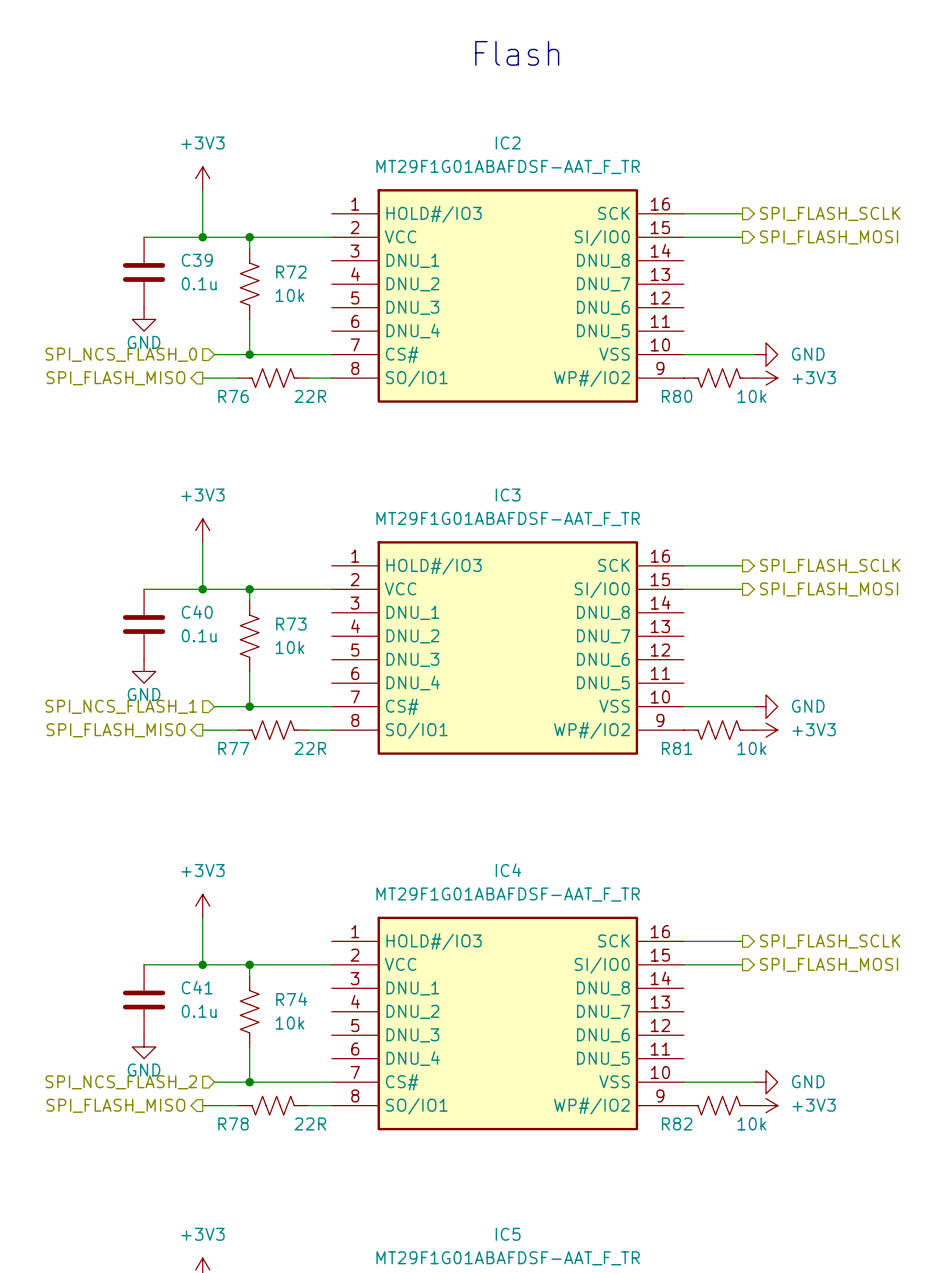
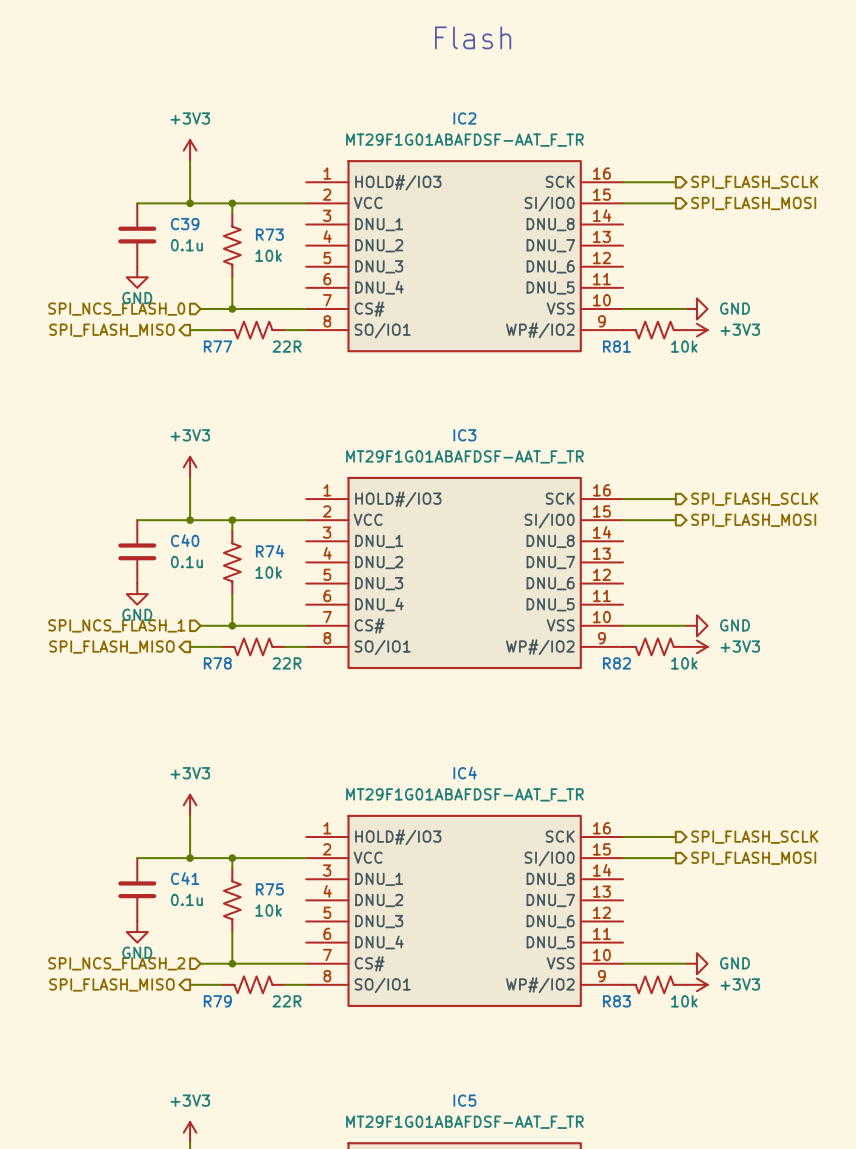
R72 name: R72 (291, 272) -> R73 (269, 234)
R76 name: R76 (233, 396) -> R77 (218, 346)
R80 name: R80 (677, 396) -> R81 (616, 346)
R73 name: R73 (291, 624) -> R74 (270, 551)
R77 name: R77 (233, 748) -> R78 (217, 663)
R81 name: R81 (677, 748) -> R82 (616, 663)
R74 name: R74 (291, 999) -> R75 (269, 889)
R78 name: R78 (233, 1123) -> R79 (217, 1001)
R82 name: R82 (677, 1123) -> R83 (616, 1001)

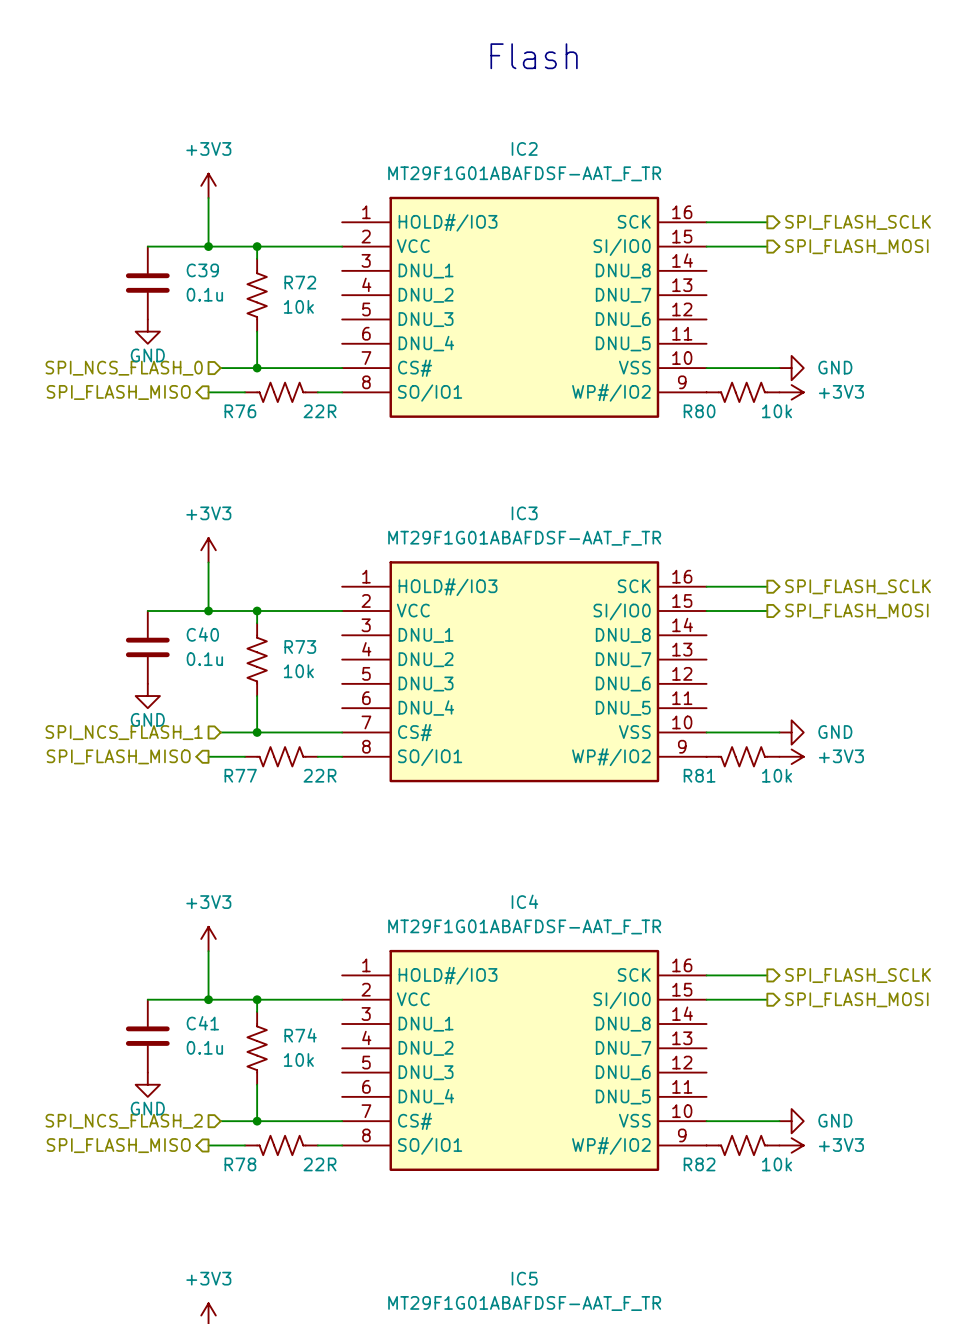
R73 name: R73 (269, 234) -> R72 (300, 282)
R77 name: R77 (218, 346) -> R76 (240, 411)
R81 name: R81 (616, 346) -> R80 (699, 411)
R74 name: R74 (270, 551) -> R73 (300, 646)
R78 name: R78 (217, 663) -> R77 (240, 775)
R82 name: R82 (616, 663) -> R81 (699, 775)
R75 name: R75 (269, 889) -> R74 (300, 1035)
R79 name: R79 (217, 1001) -> R78 (240, 1164)
R83 name: R83 (616, 1001) -> R82 (699, 1164)

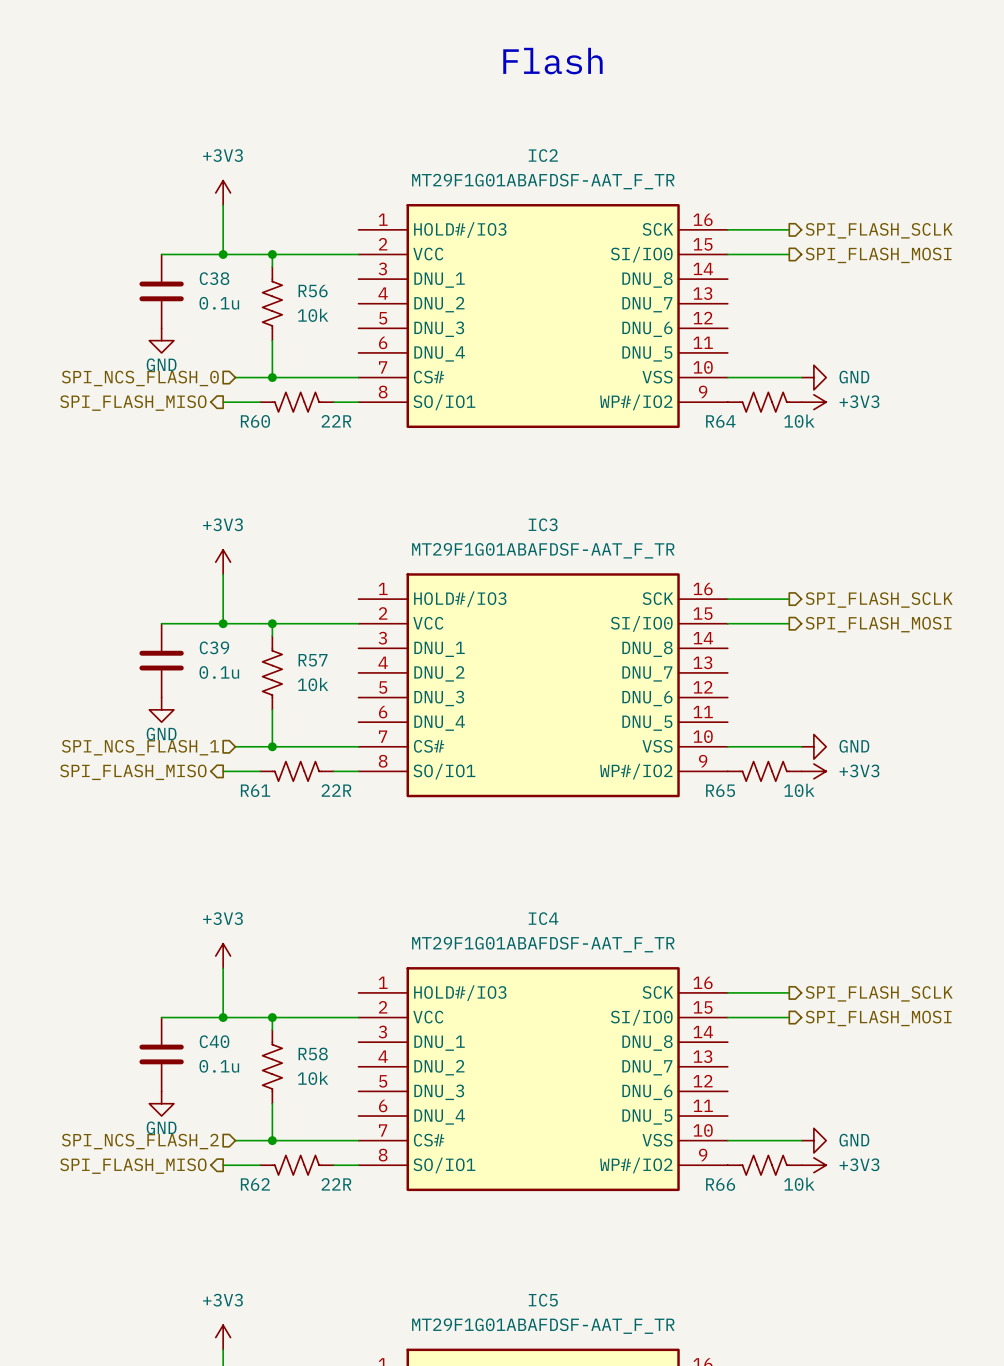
C39 name: C39 (202, 270) -> C38 (214, 278)
R72 name: R72 (300, 282) -> R56 (313, 291)
R76 name: R76 (240, 411) -> R60 (255, 421)
R80 name: R80 (699, 411) -> R64 (720, 421)
C40 name: C40 (202, 634) -> C39 (214, 647)
R73 name: R73 (300, 646) -> R57 (313, 660)
R77 name: R77 (240, 775) -> R61 (255, 790)
R81 name: R81 (699, 775) -> R65 (720, 790)
C41 name: C41 (202, 1023) -> C40 (214, 1041)
R74 name: R74 (300, 1035) -> R58 (313, 1054)
R78 name: R78 (240, 1164) -> R62 (255, 1184)
R82 name: R82 (699, 1164) -> R66 (720, 1184)

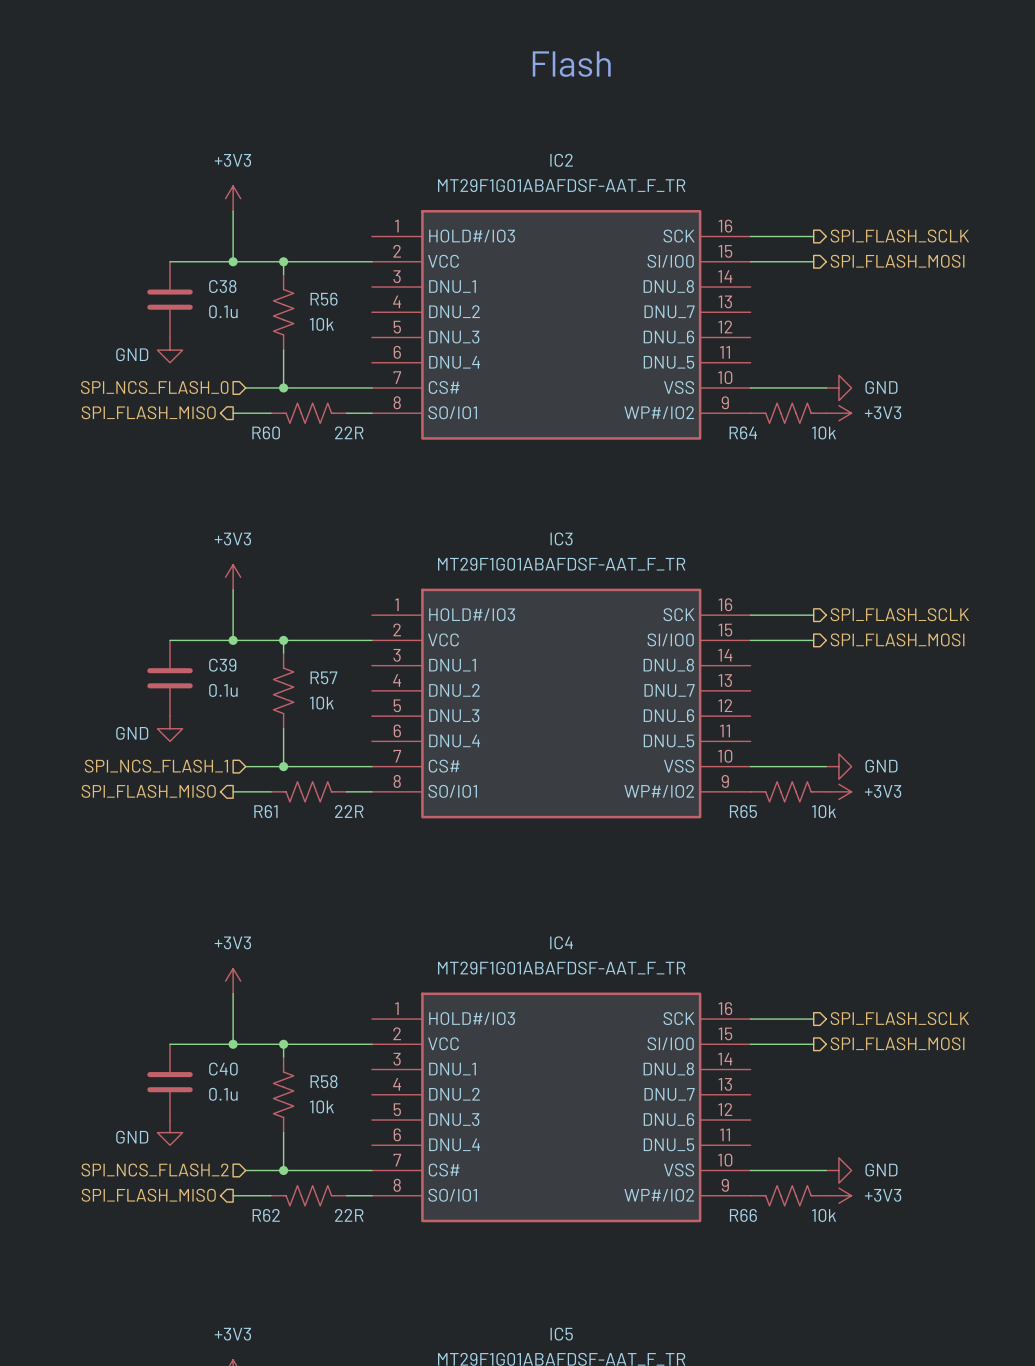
power symbol text position: GND (161, 364) -> GND (132, 354)
power symbol text position: GND (161, 734) -> GND (132, 733)
power symbol text position: GND (161, 1127) -> GND (132, 1137)

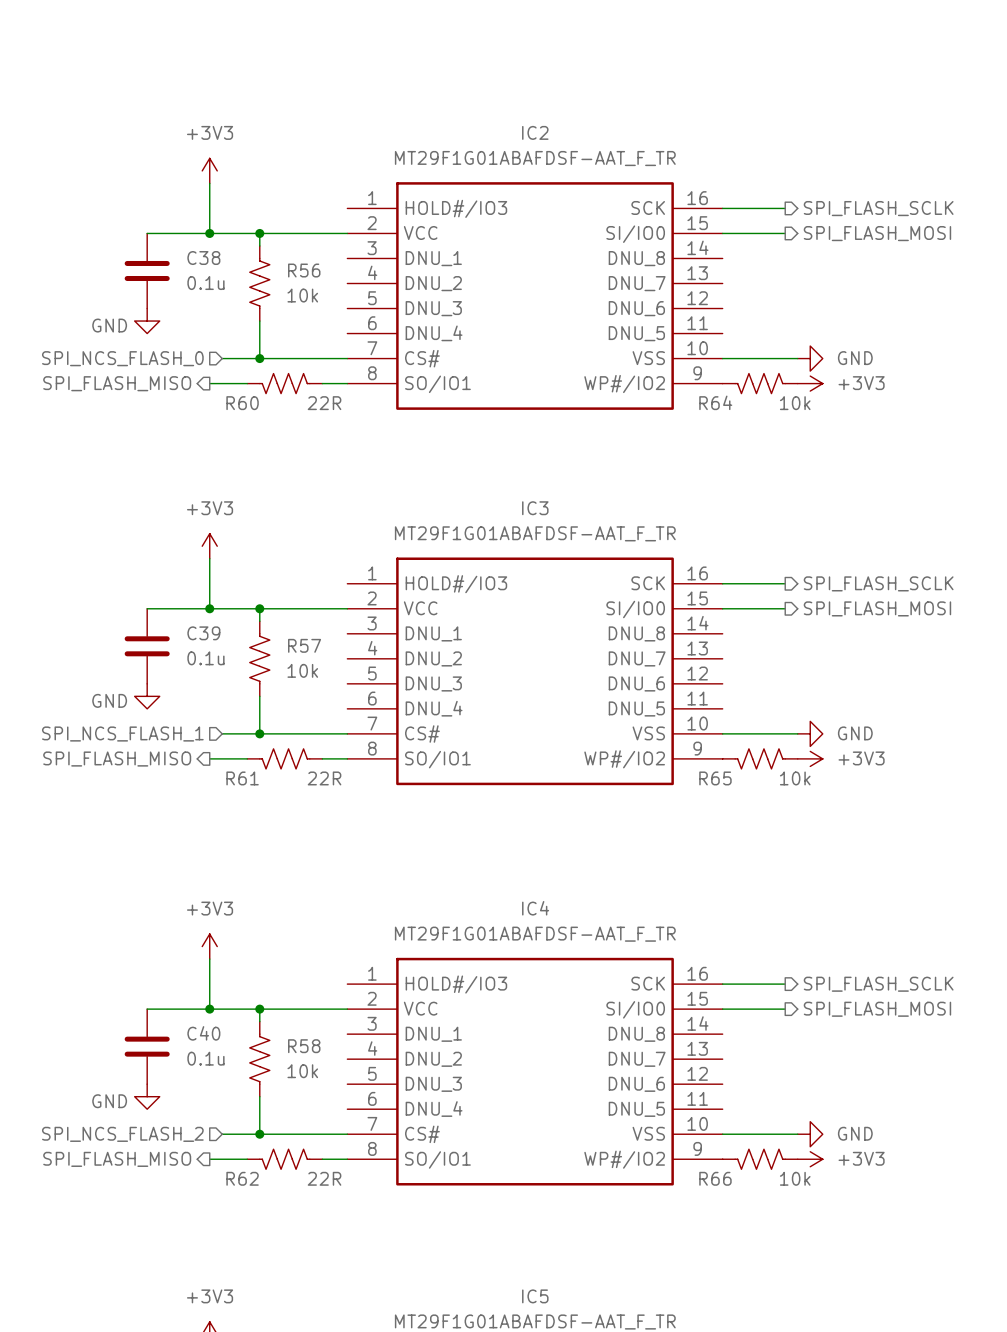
text: Flash (571, 64) -> none

